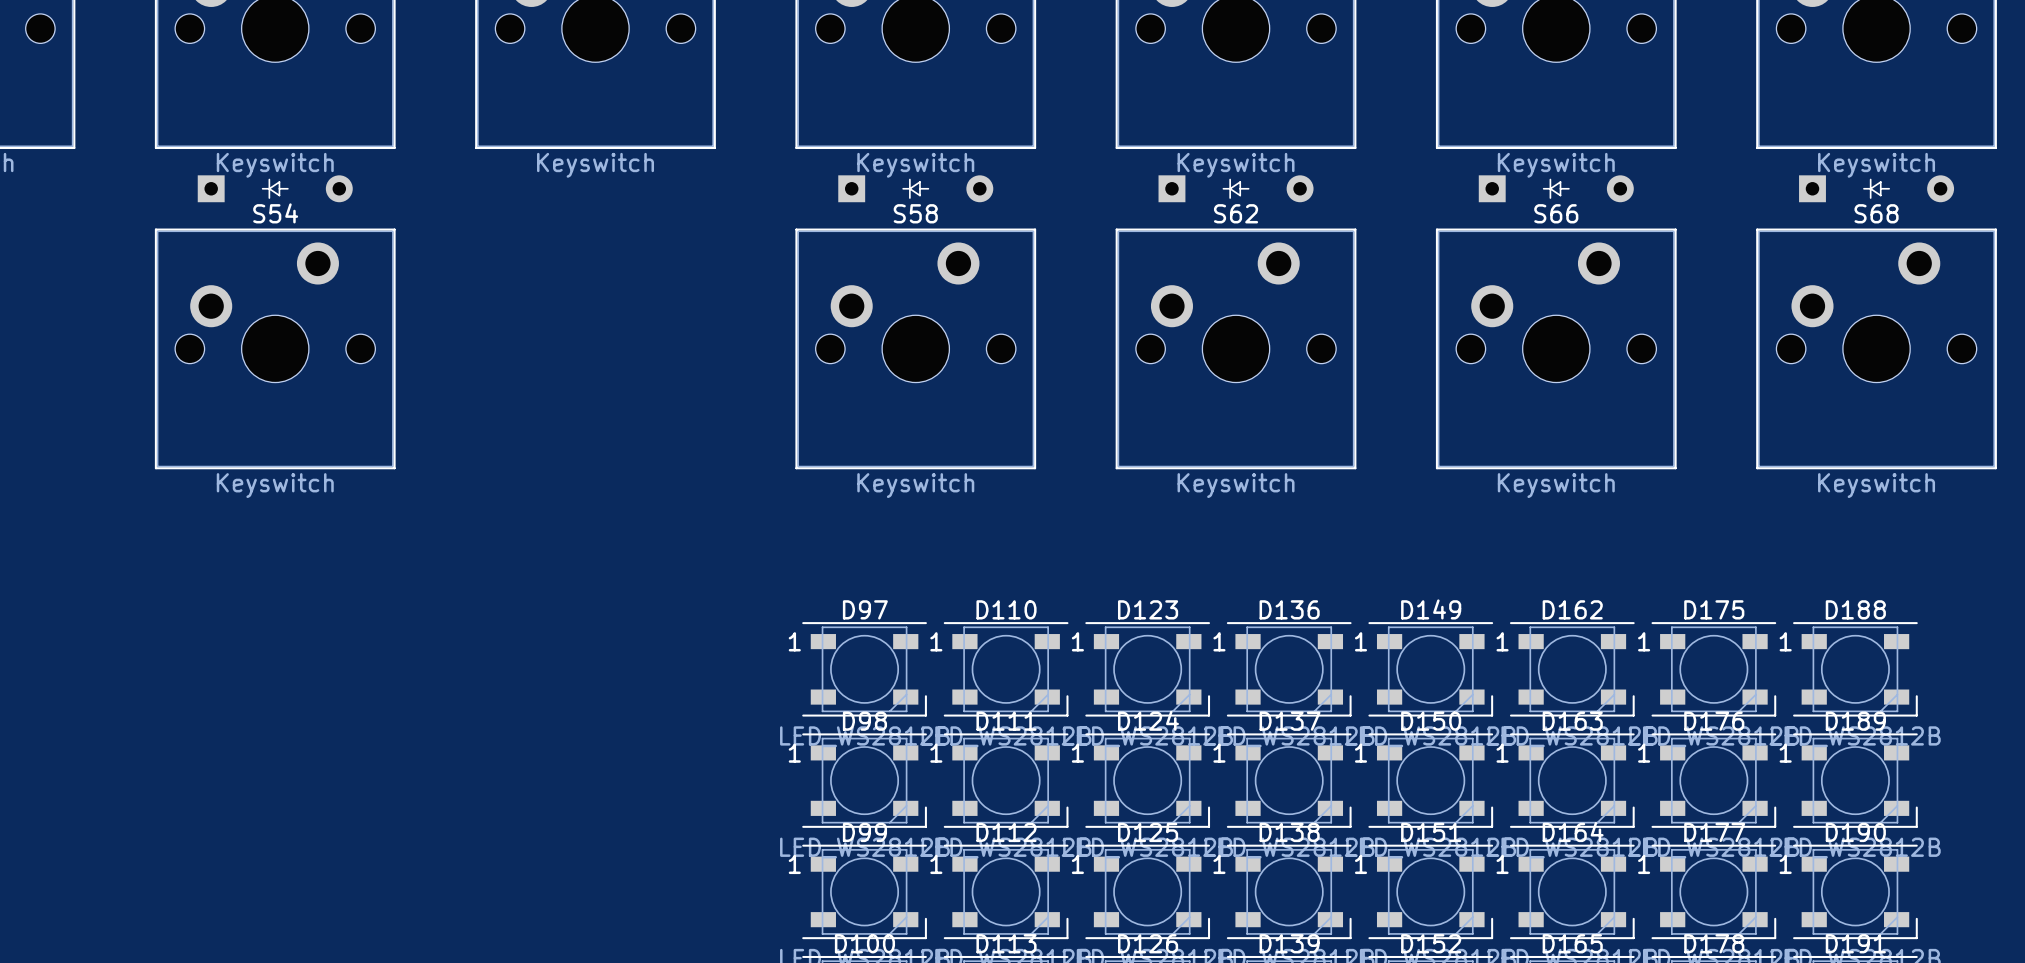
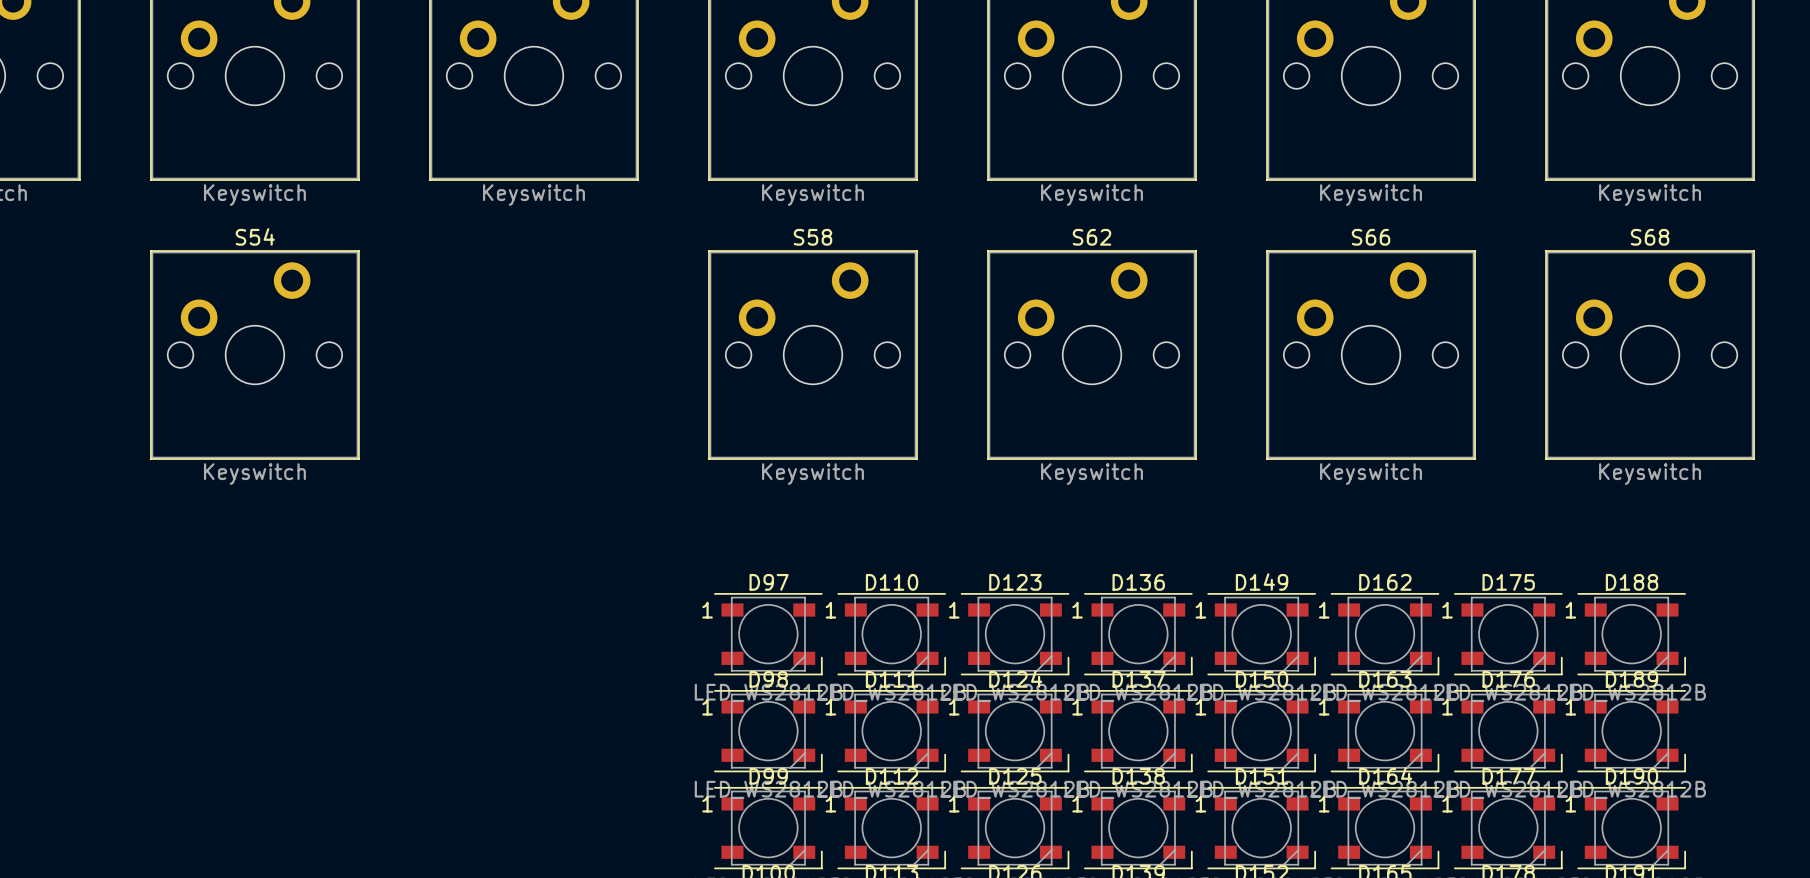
part: (275, 188) -> none
part: (915, 188) -> none
part: (1236, 188) -> none
part: (1556, 188) -> none
part: (1876, 188) -> none

